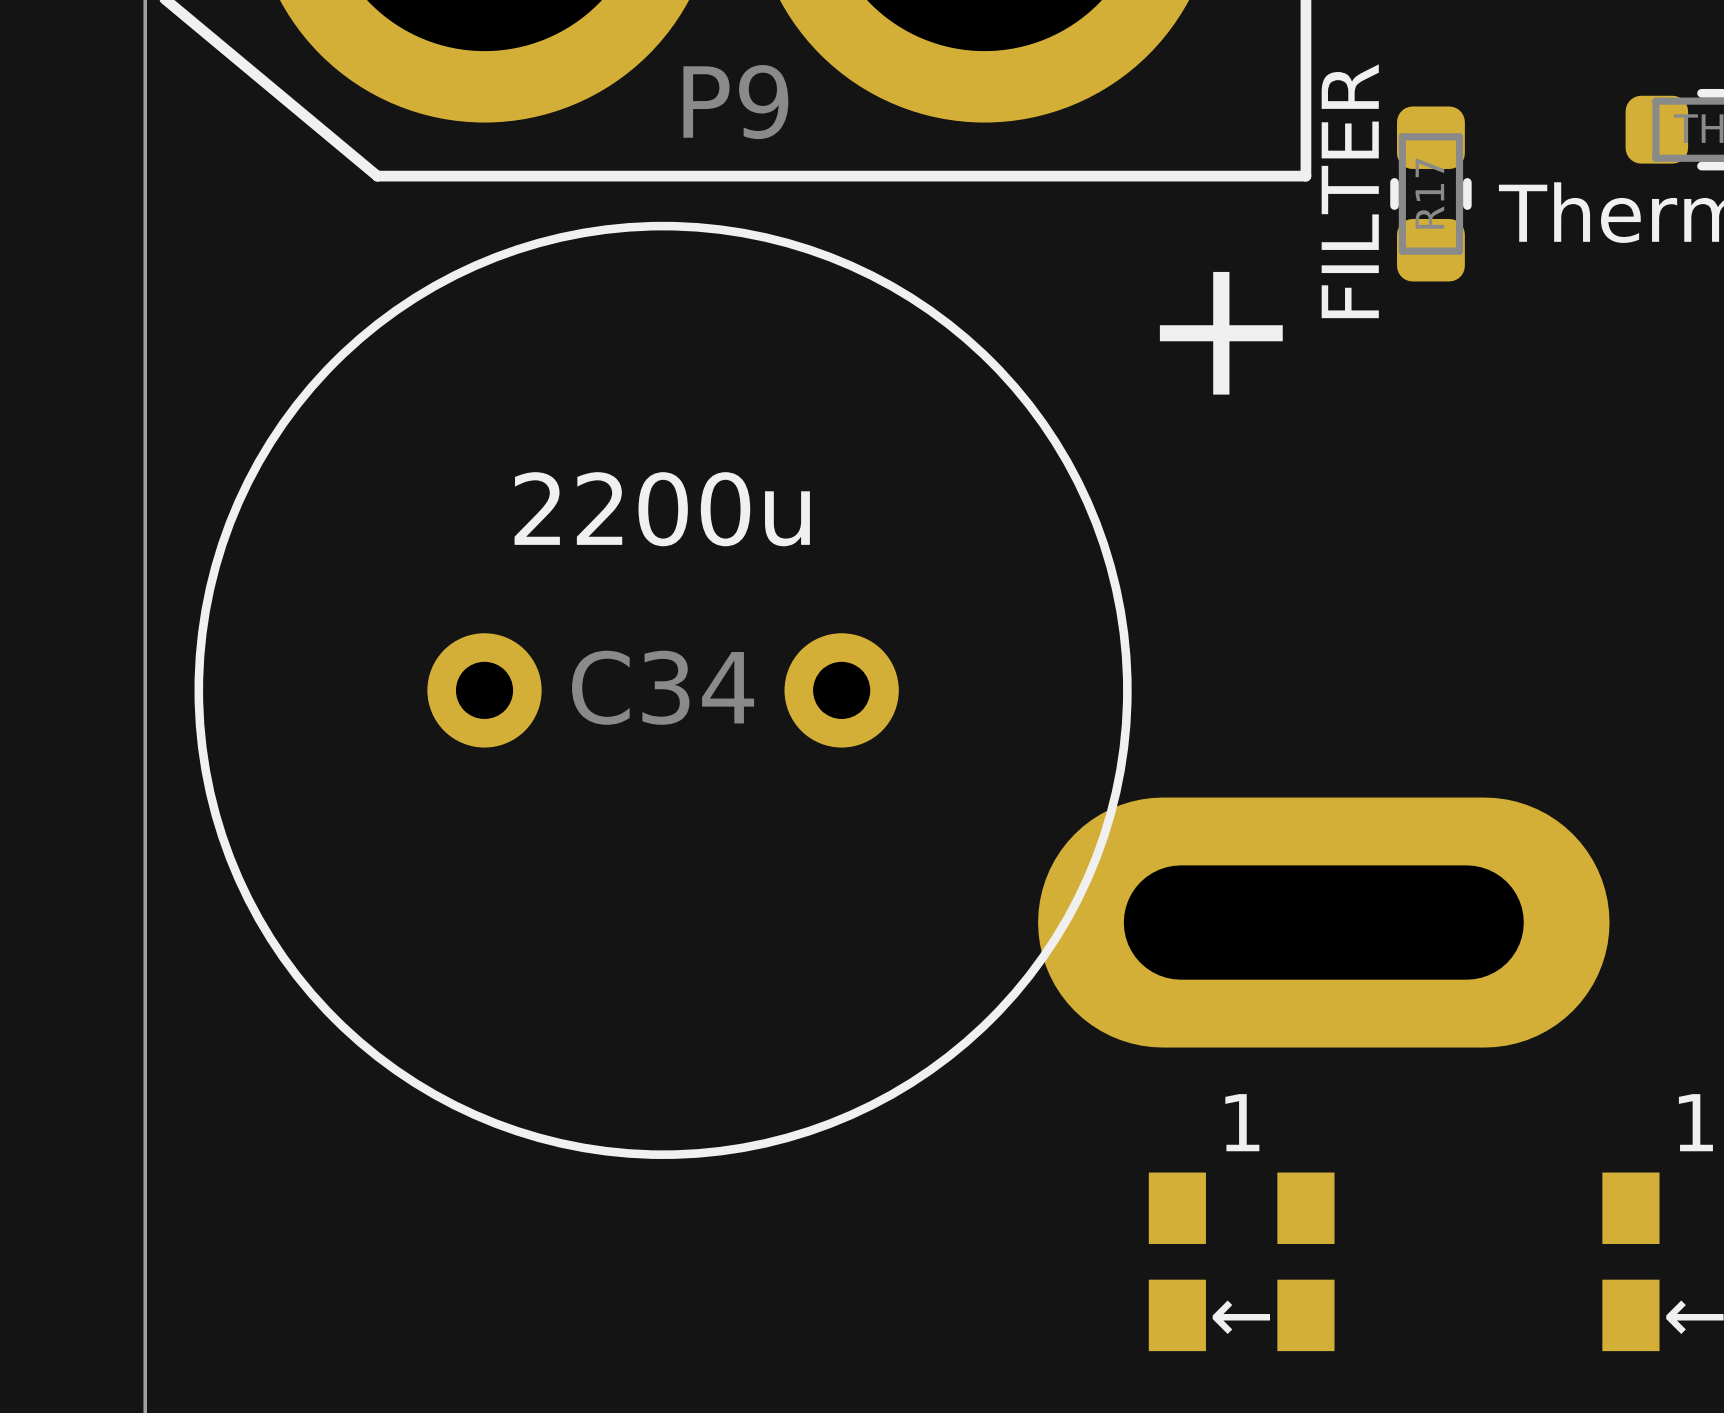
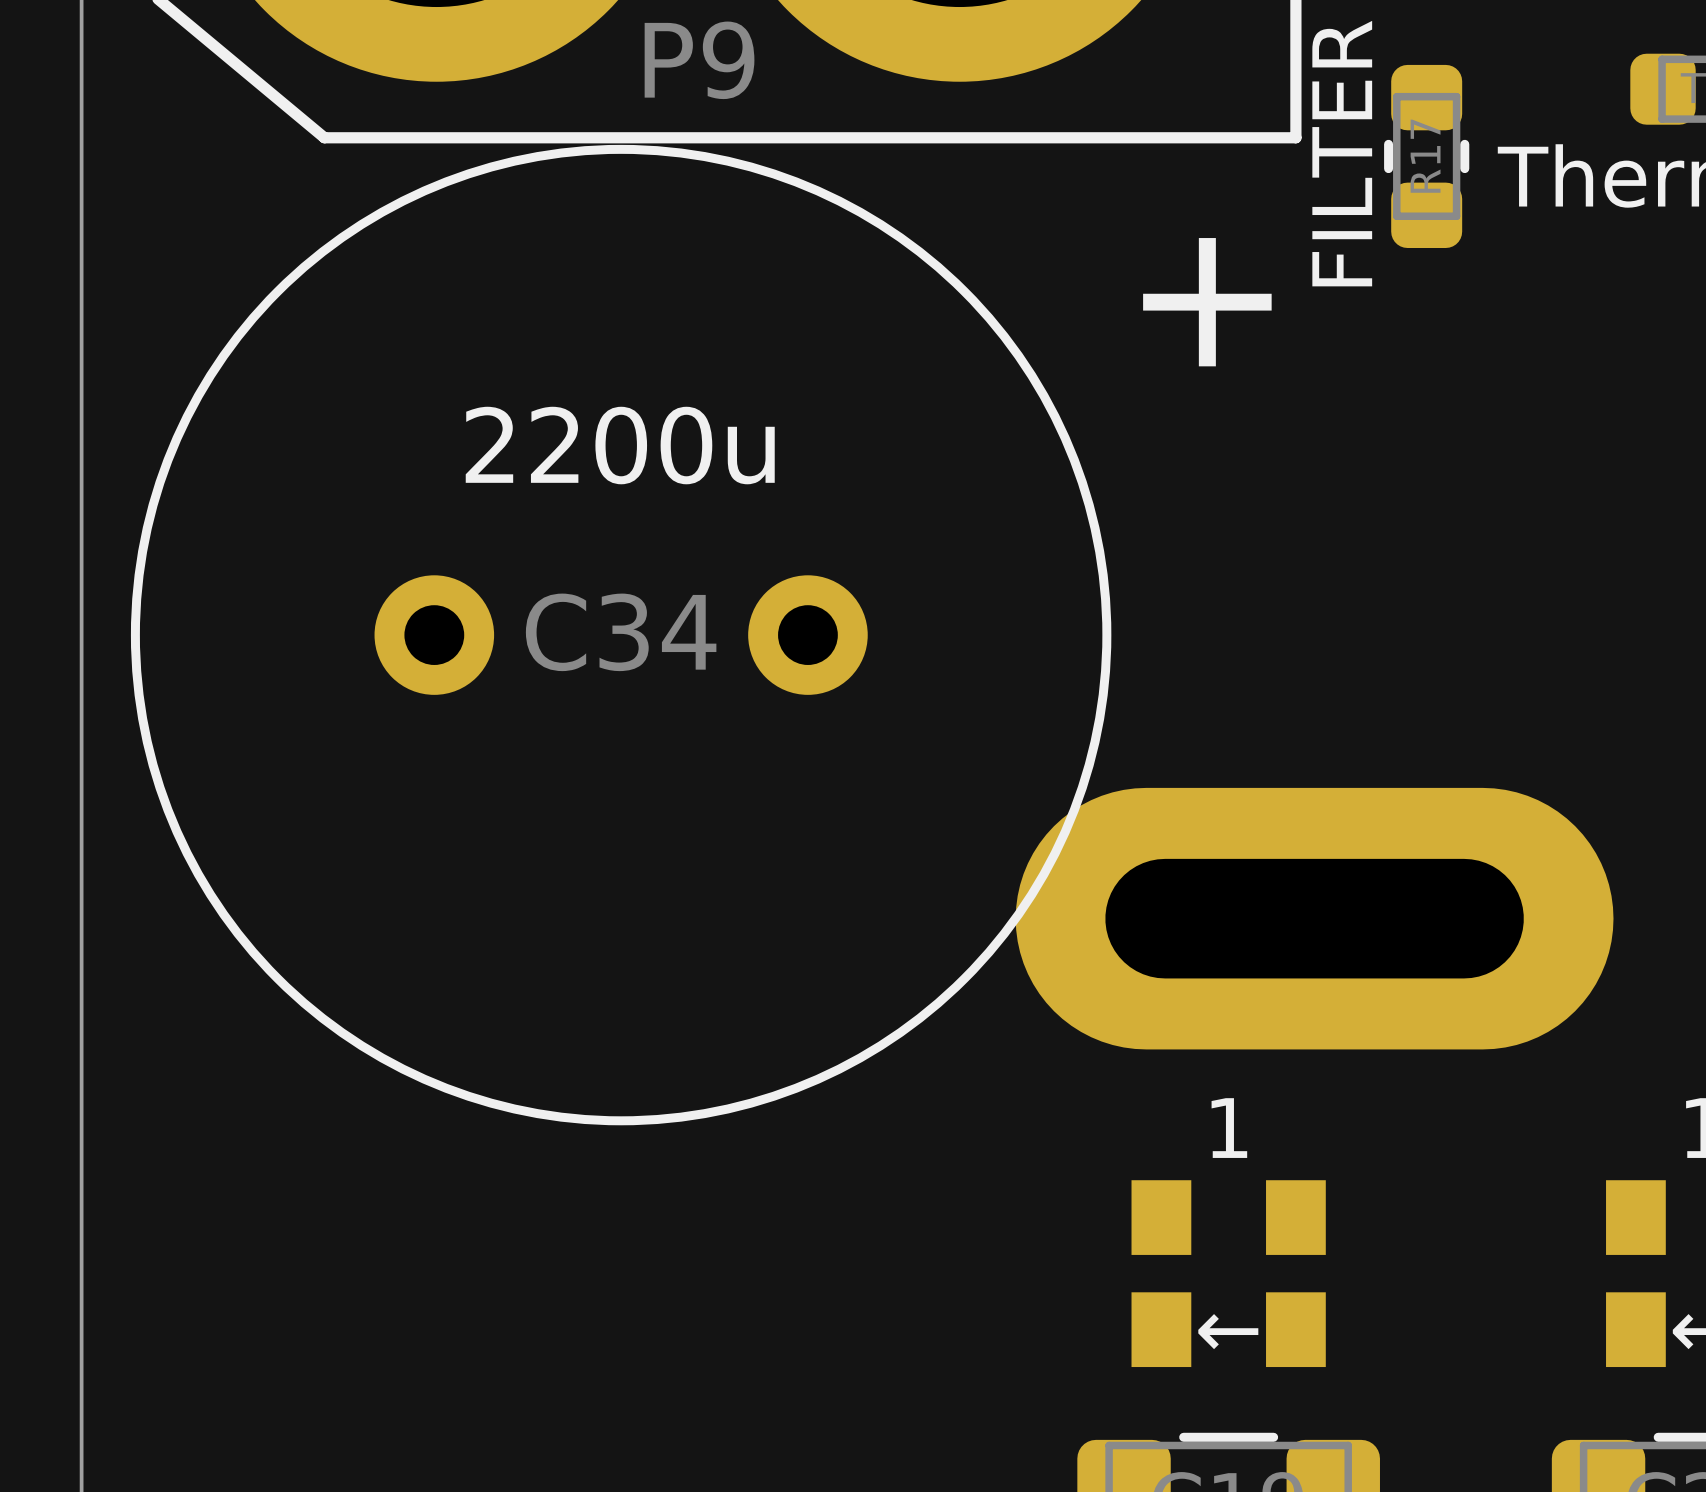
C34 position: (663, 690) -> (621, 635)

